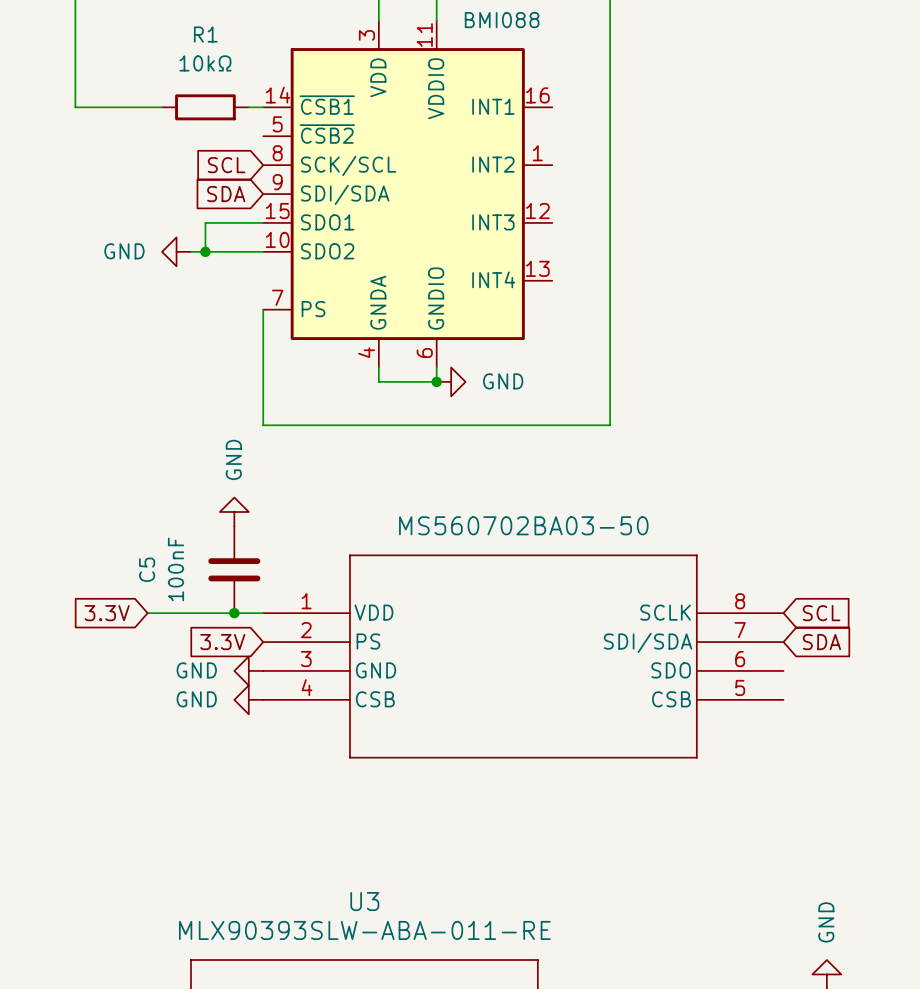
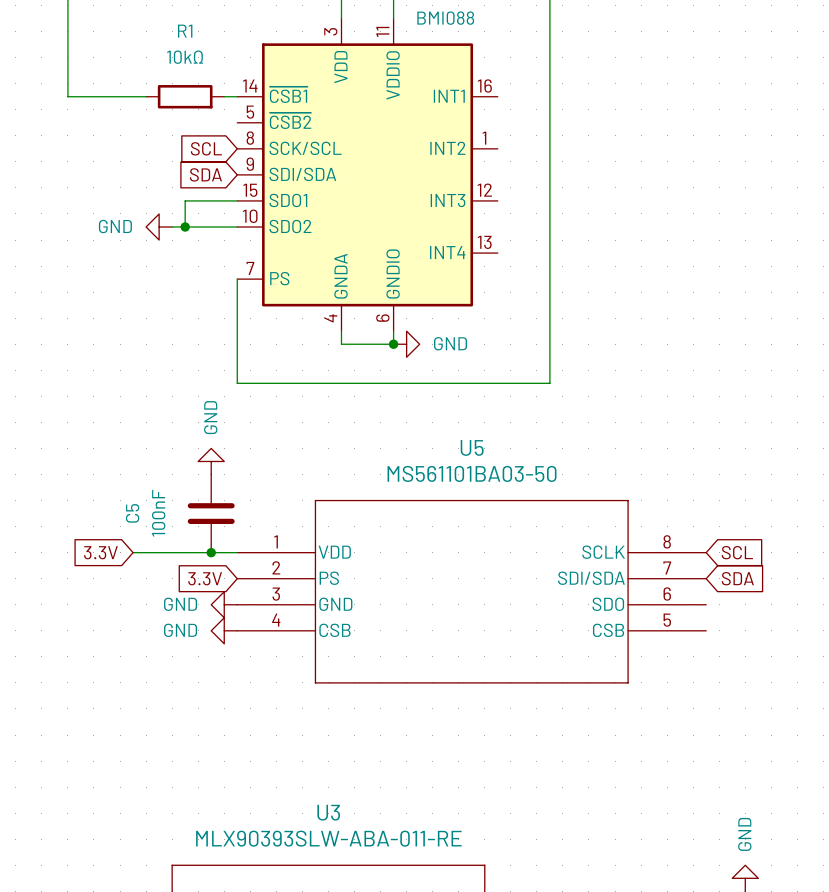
U5 name: none -> U5 (472, 447)
U5 value: MS560702BA03-50 (523, 525) -> MS561101BA03-50 (472, 473)

